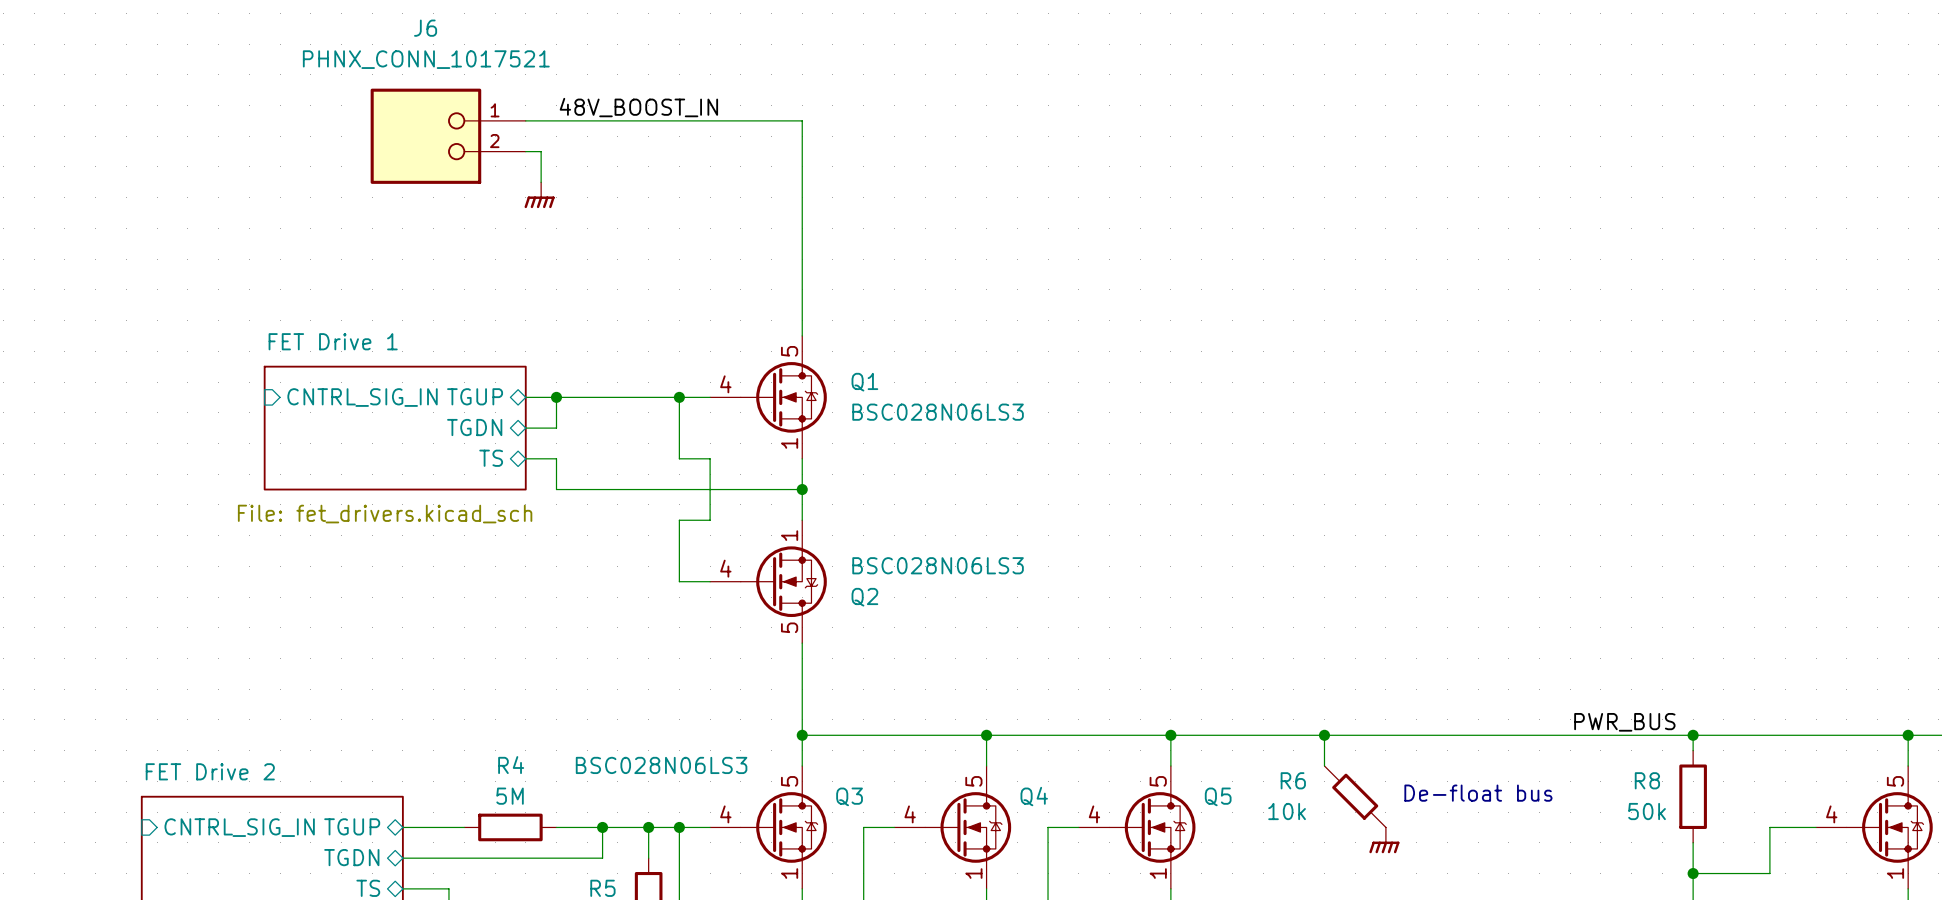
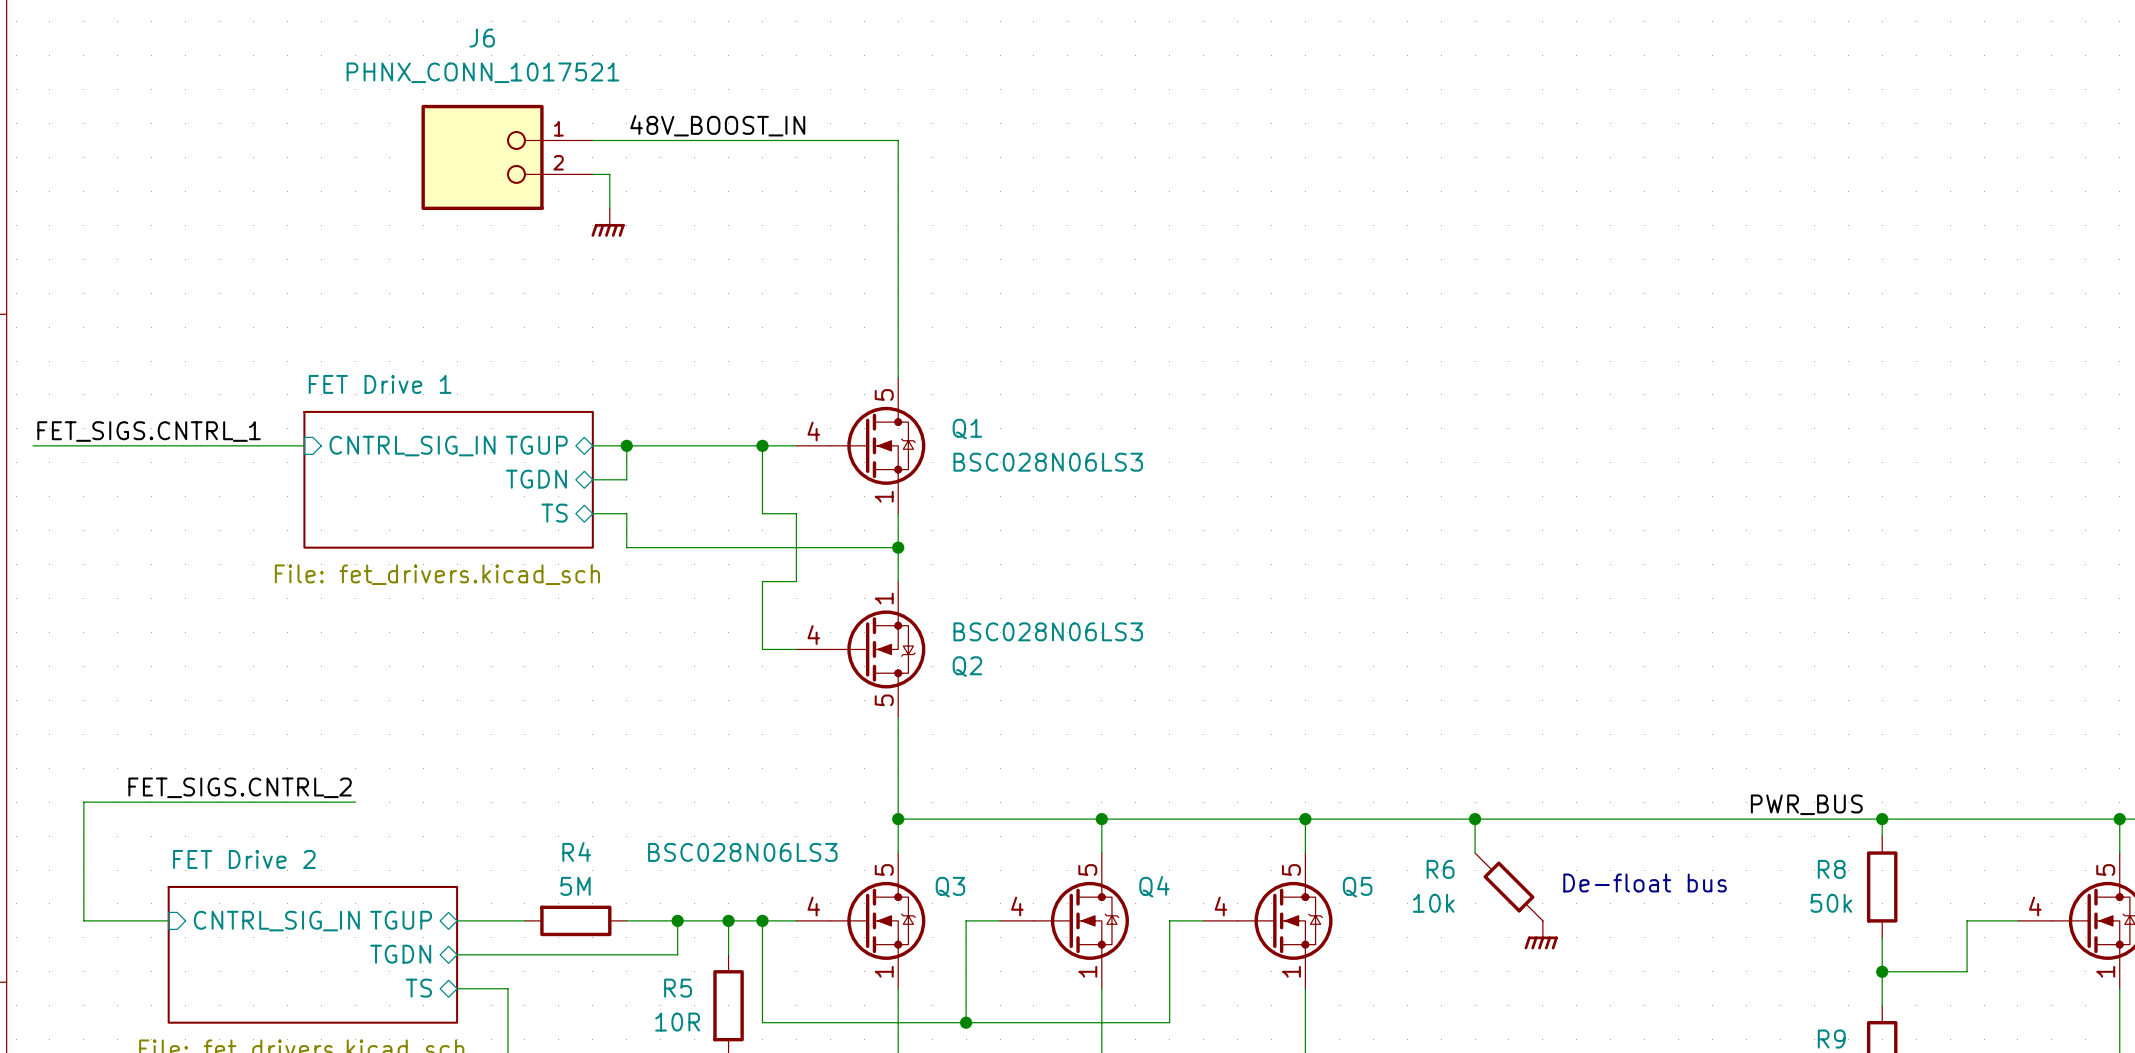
label: none -> FET_SIGS.CNTRL_1 (149, 431)
wire: none -> (32, 445) (304, 445)
label: none -> FET_SIGS.CNTRL_2 (240, 787)
wire: none -> (355, 802) (83, 802) (83, 920) (168, 920)

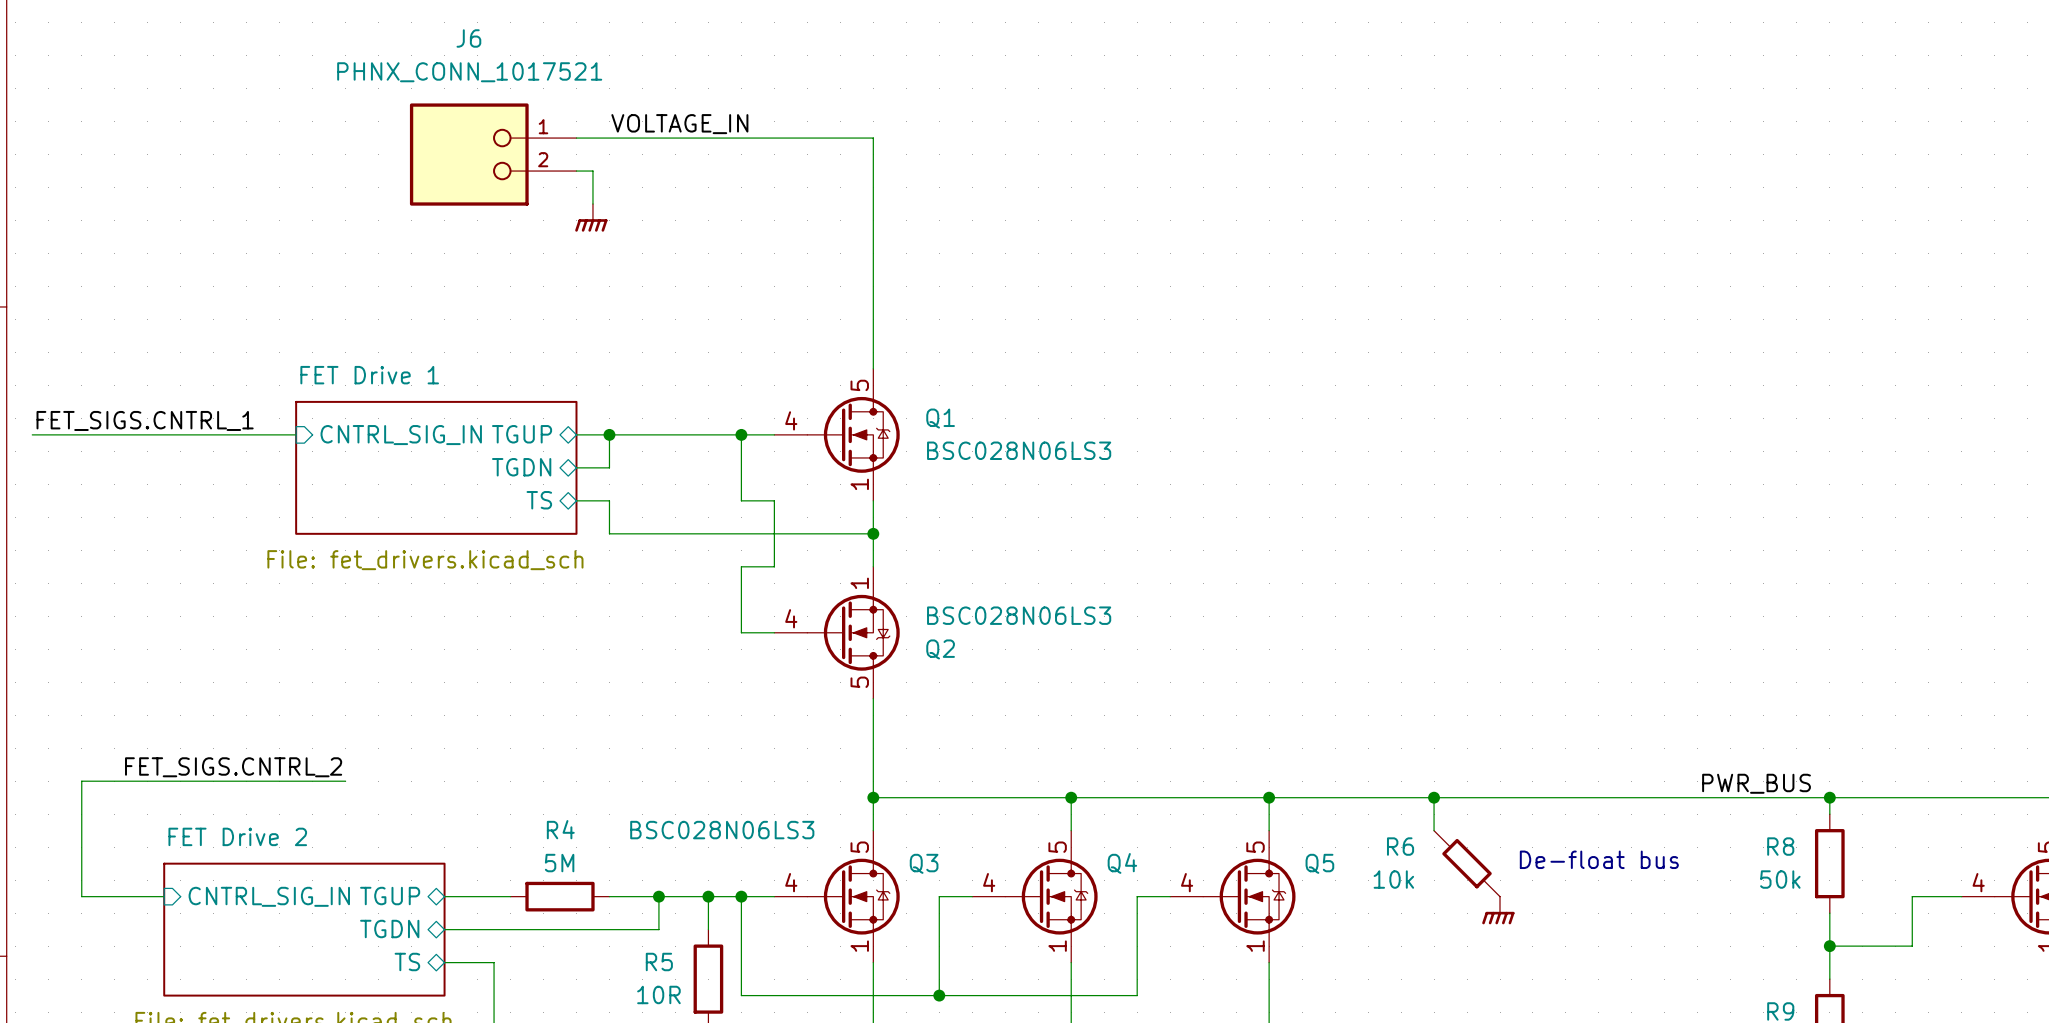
label: 48V_BOOST_IN (717, 125) -> VOLTAGE_IN (679, 124)

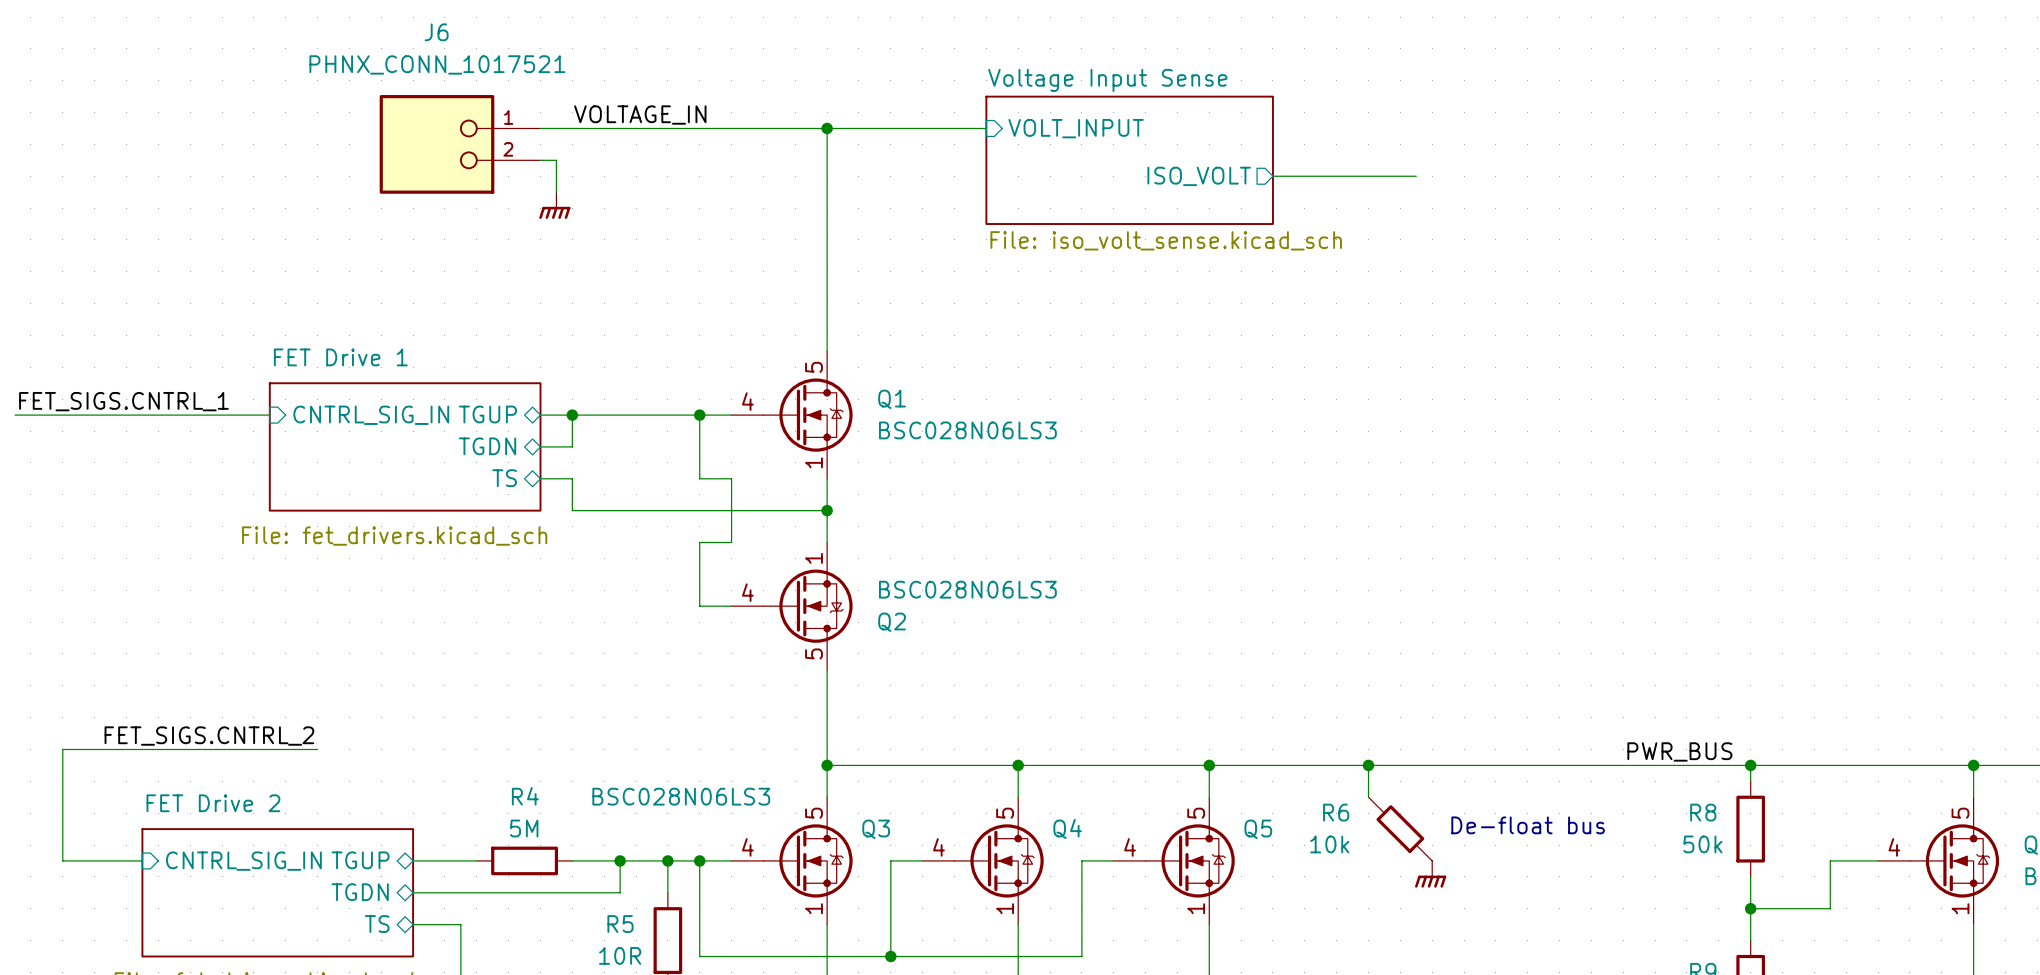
wire: none -> (827, 128) (986, 128)
junction: none -> (827, 128)
sheet pin: none -> VOLT_INPUT (1076, 128)
sheet Voltage Input Sense: none -> File: iso_volt_sense.kicad_sch (1129, 160)
sheet pin: none -> ISO_VOLT (1199, 176)
wire: none -> (1272, 176) (1416, 176)

